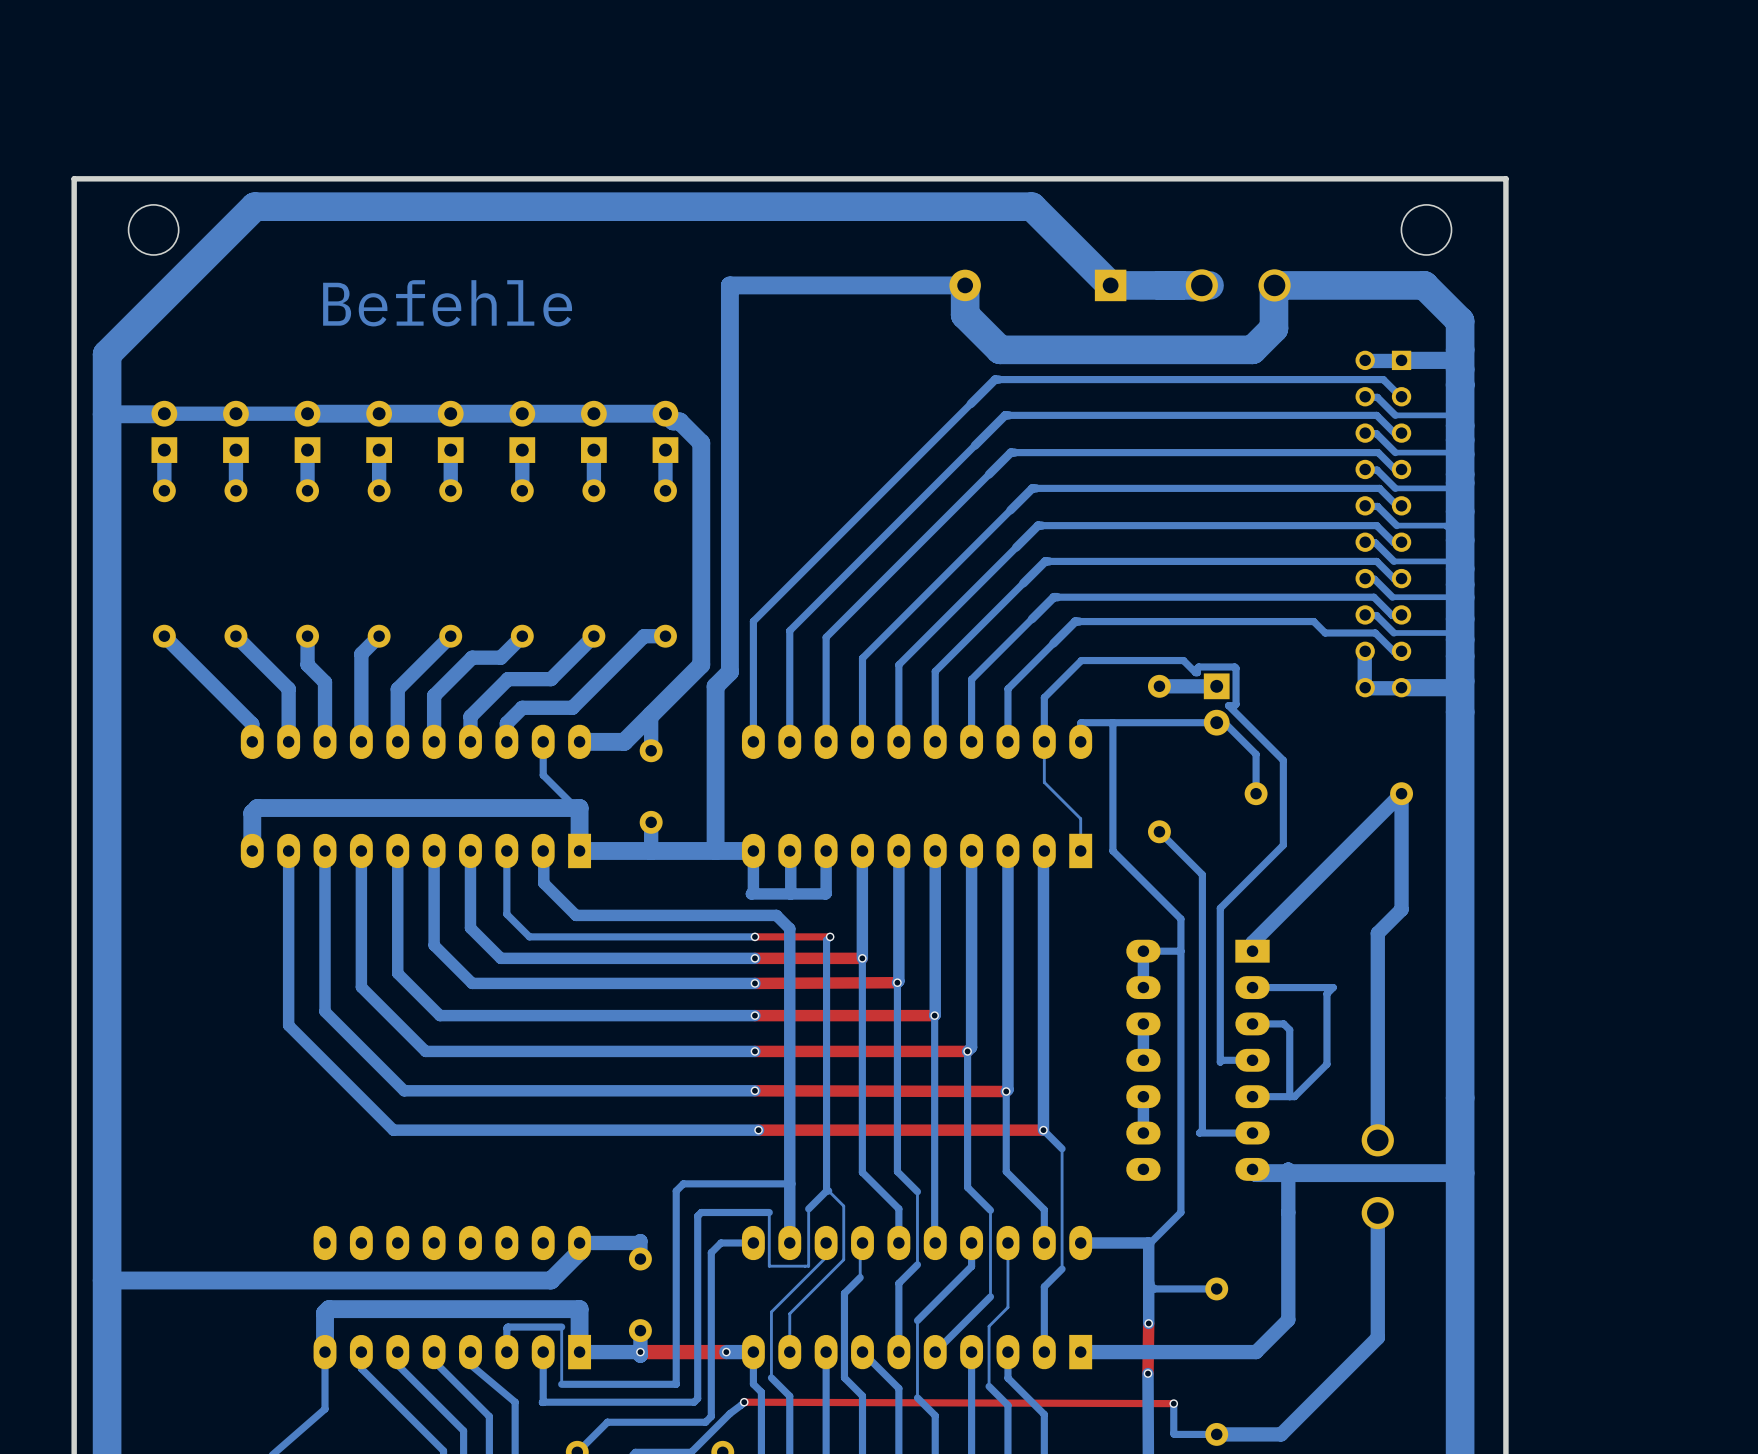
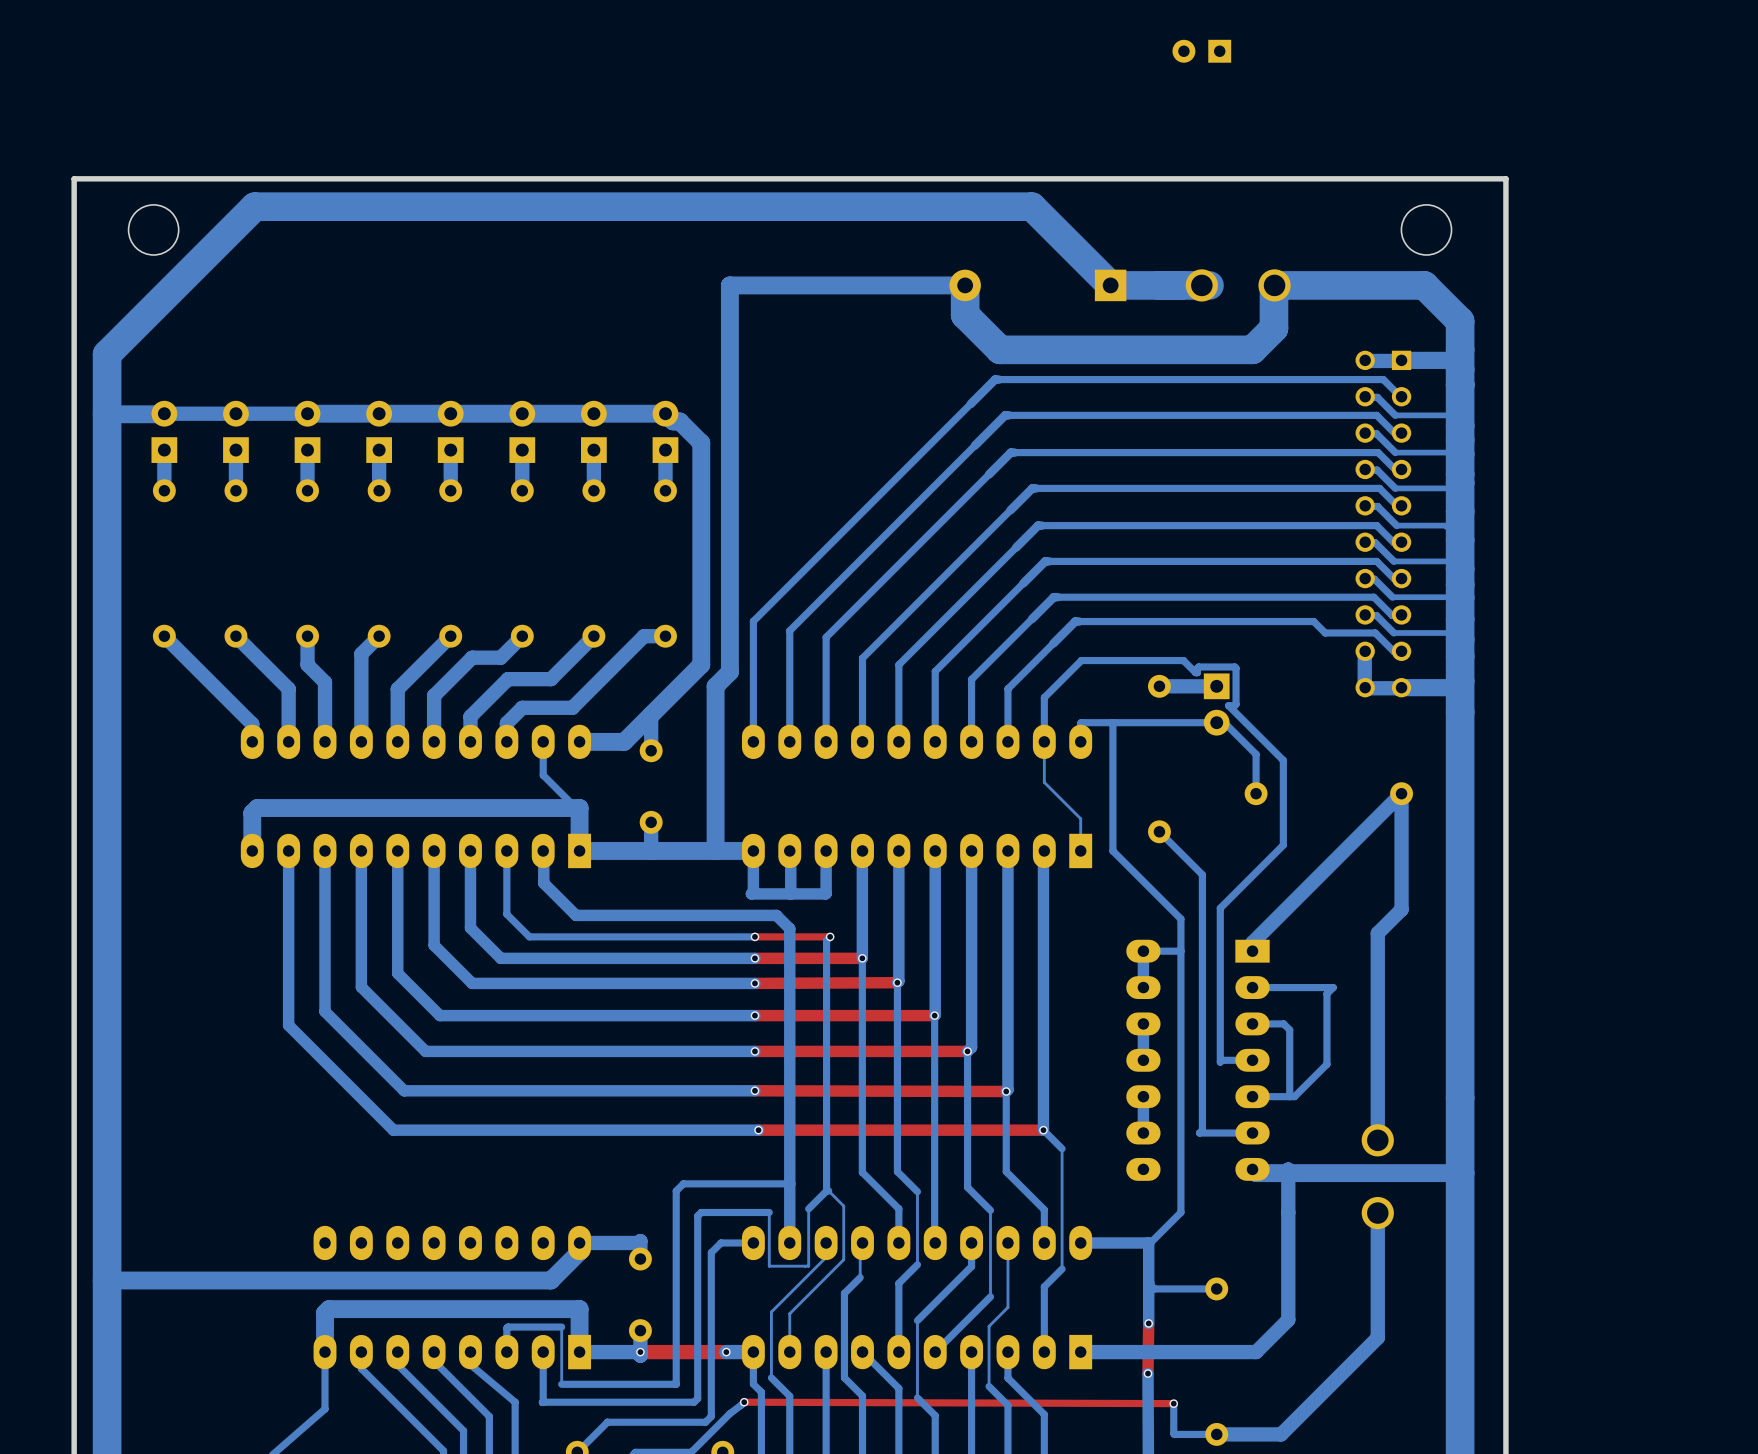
part: none -> (1201, 51)
text: Befehle (447, 303) -> none

